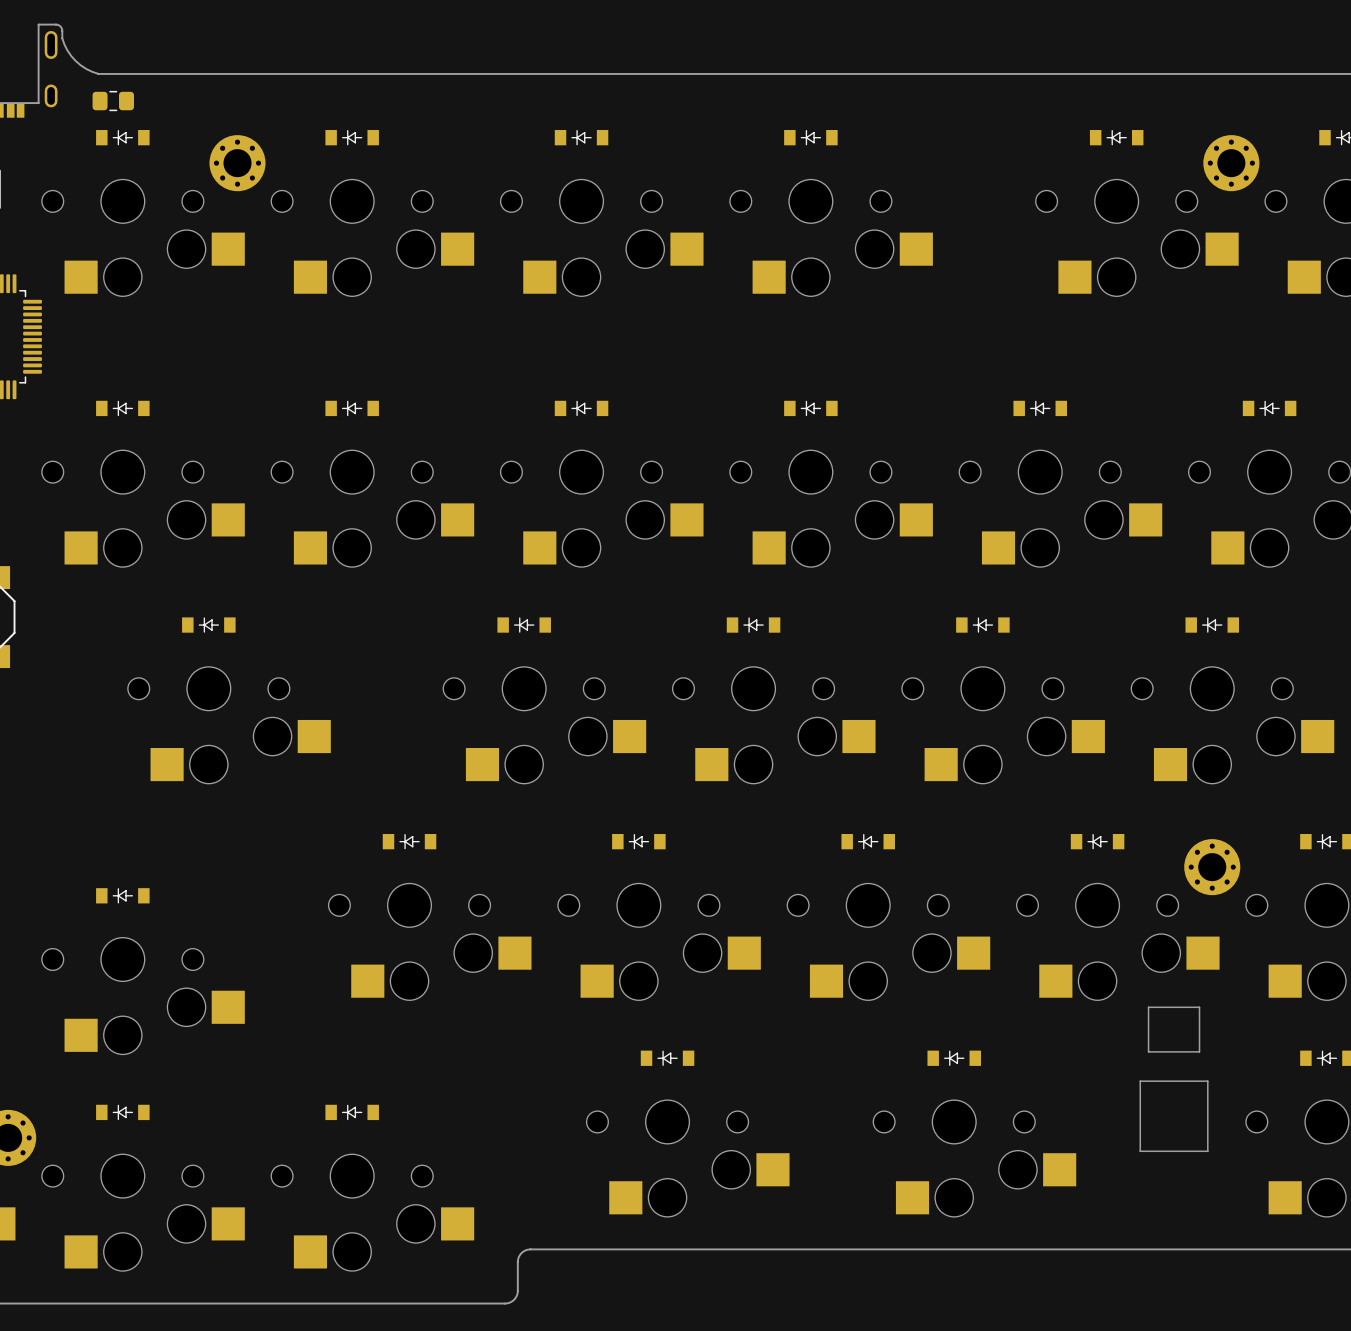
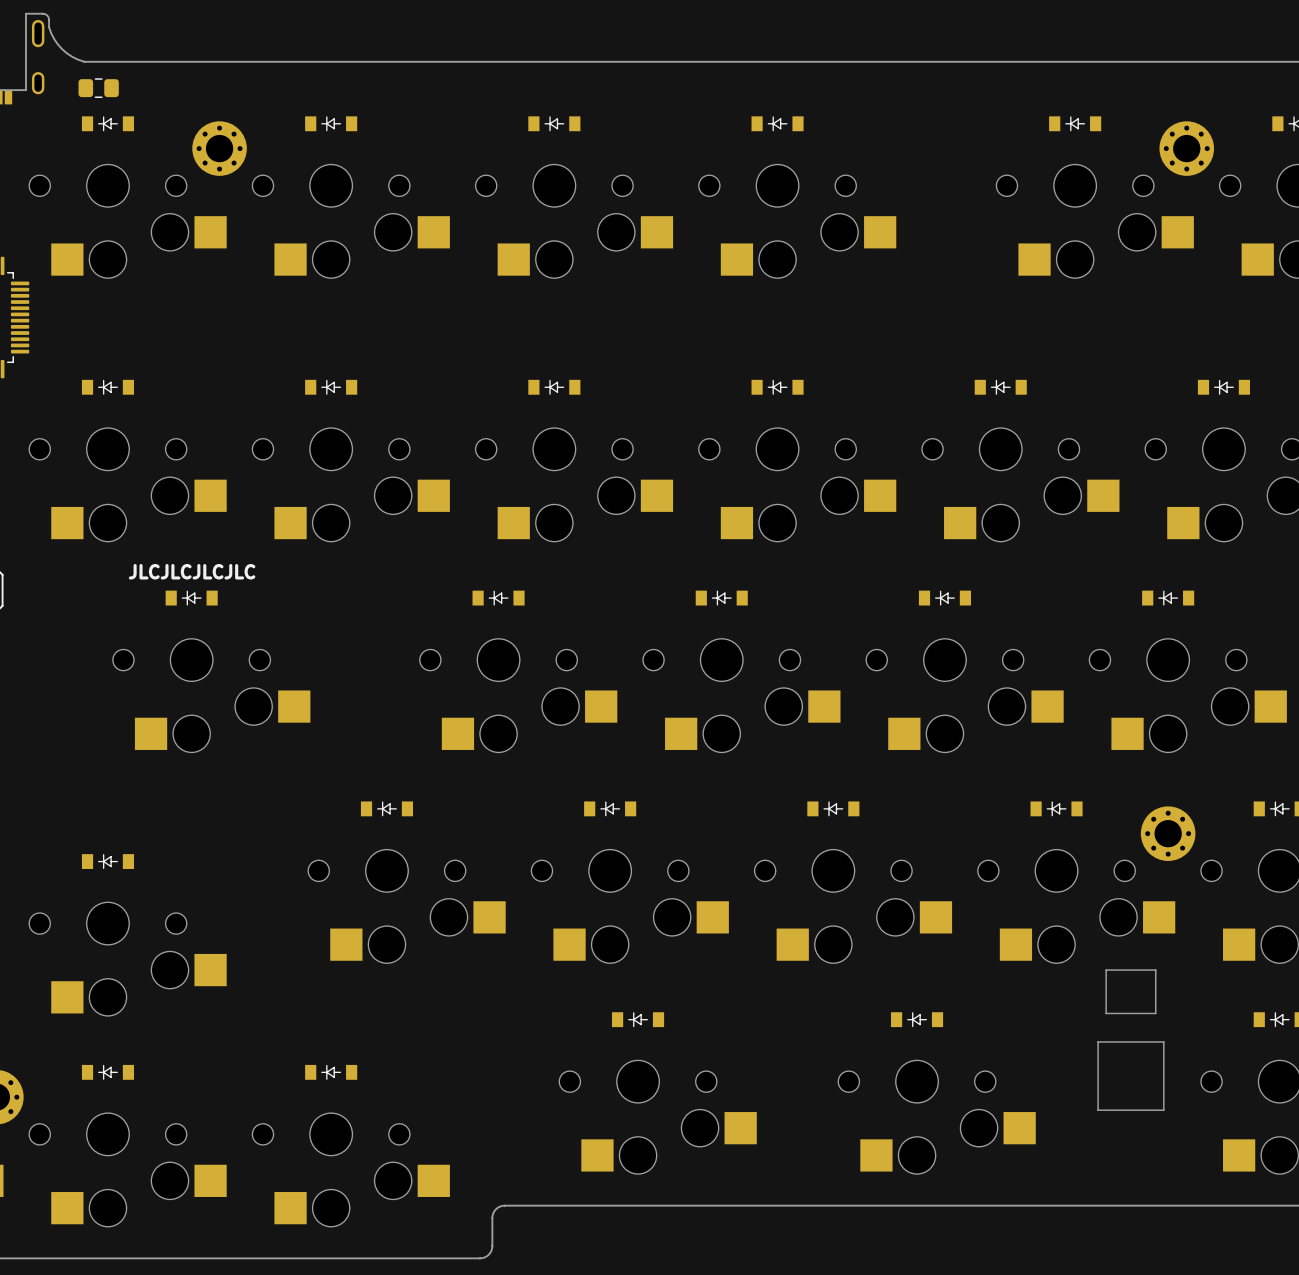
text: none -> JLCJLCJLCJLC (192, 571)

